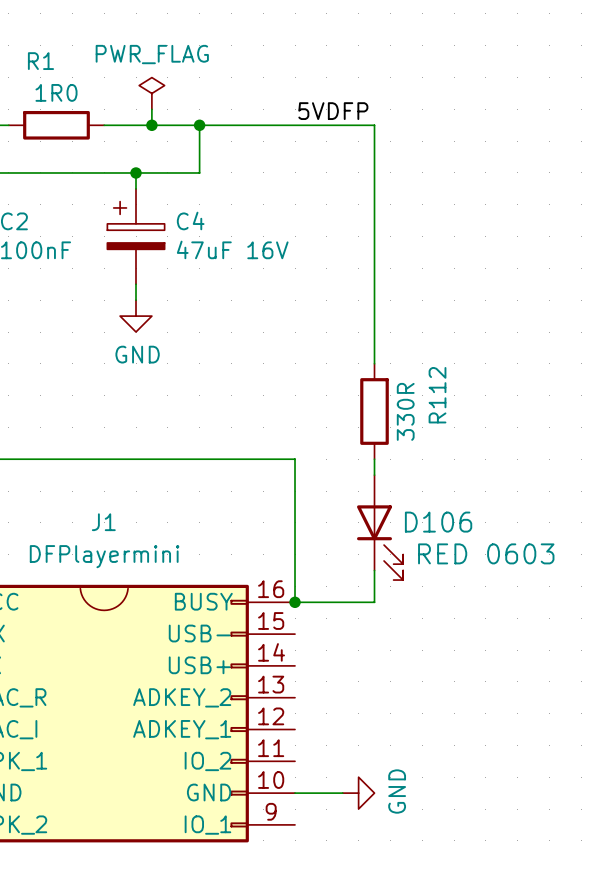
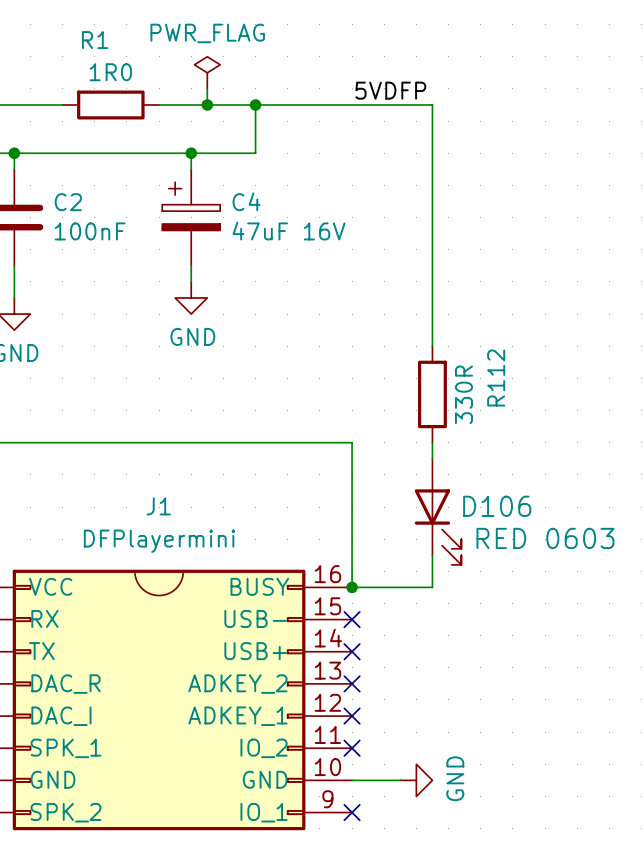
no-connect mark: none -> (352, 619)
no-connect mark: none -> (352, 651)
no-connect mark: none -> (352, 683)
no-connect mark: none -> (352, 716)
no-connect mark: none -> (352, 748)
no-connect mark: none -> (352, 812)

